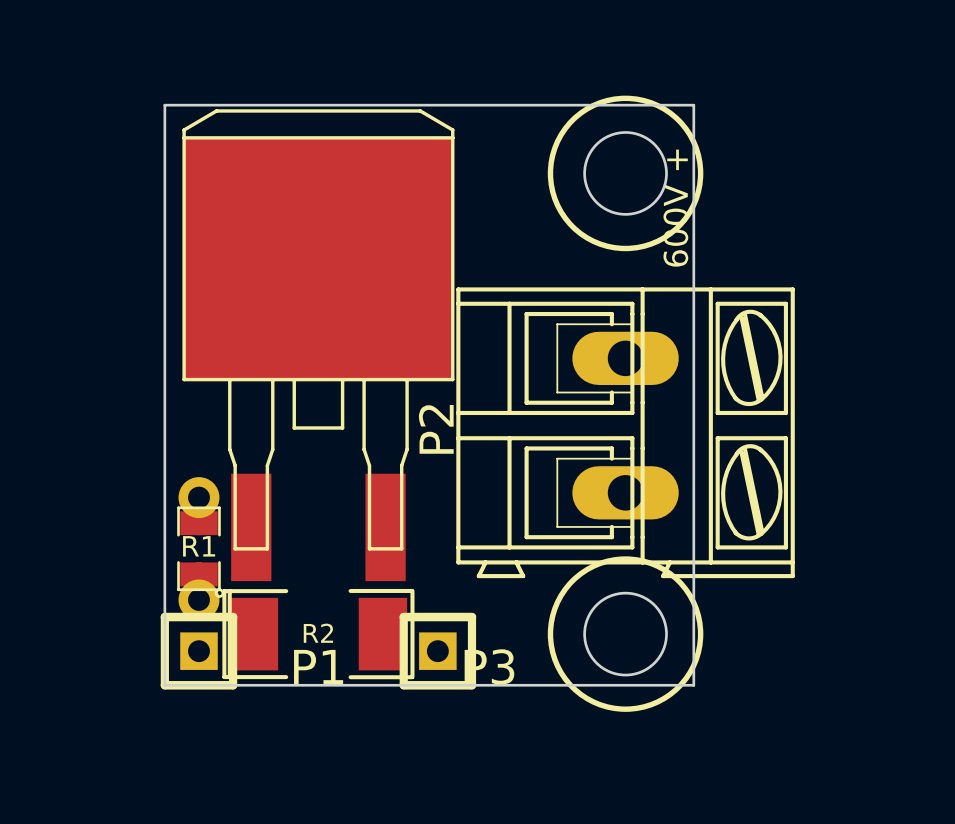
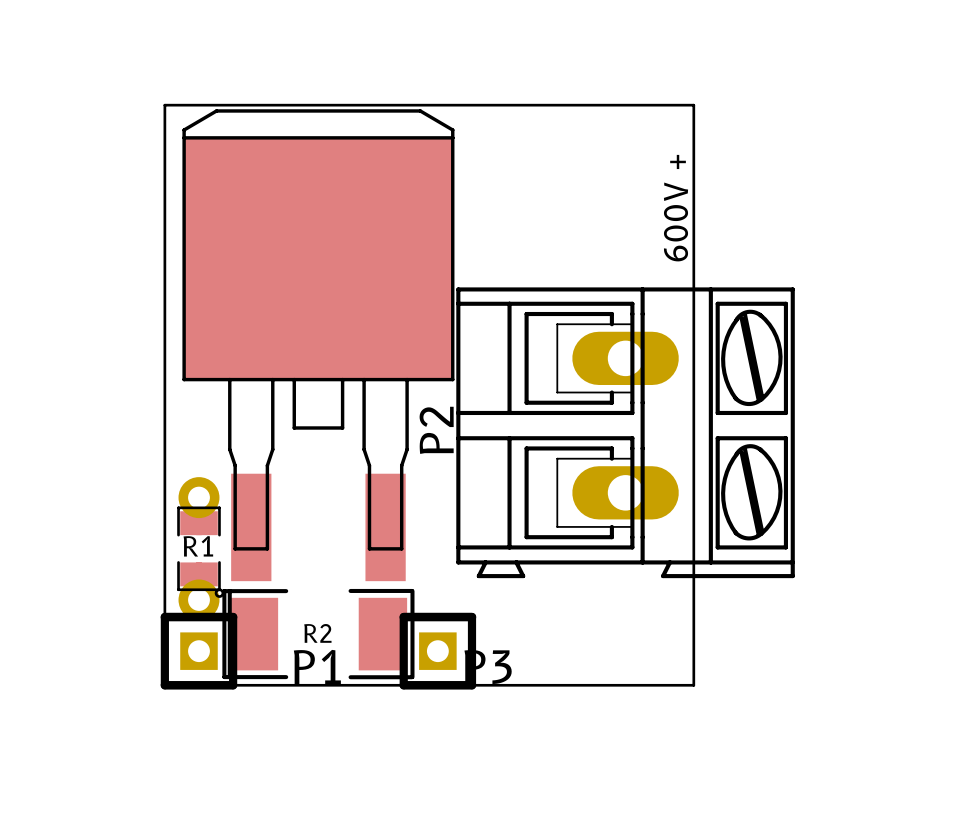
drawing: [547, 95, 704, 252] -> none
round board edge: [583, 131, 668, 216] -> none
drawing: [547, 556, 704, 712] -> none
round board edge: [583, 591, 668, 677] -> none

